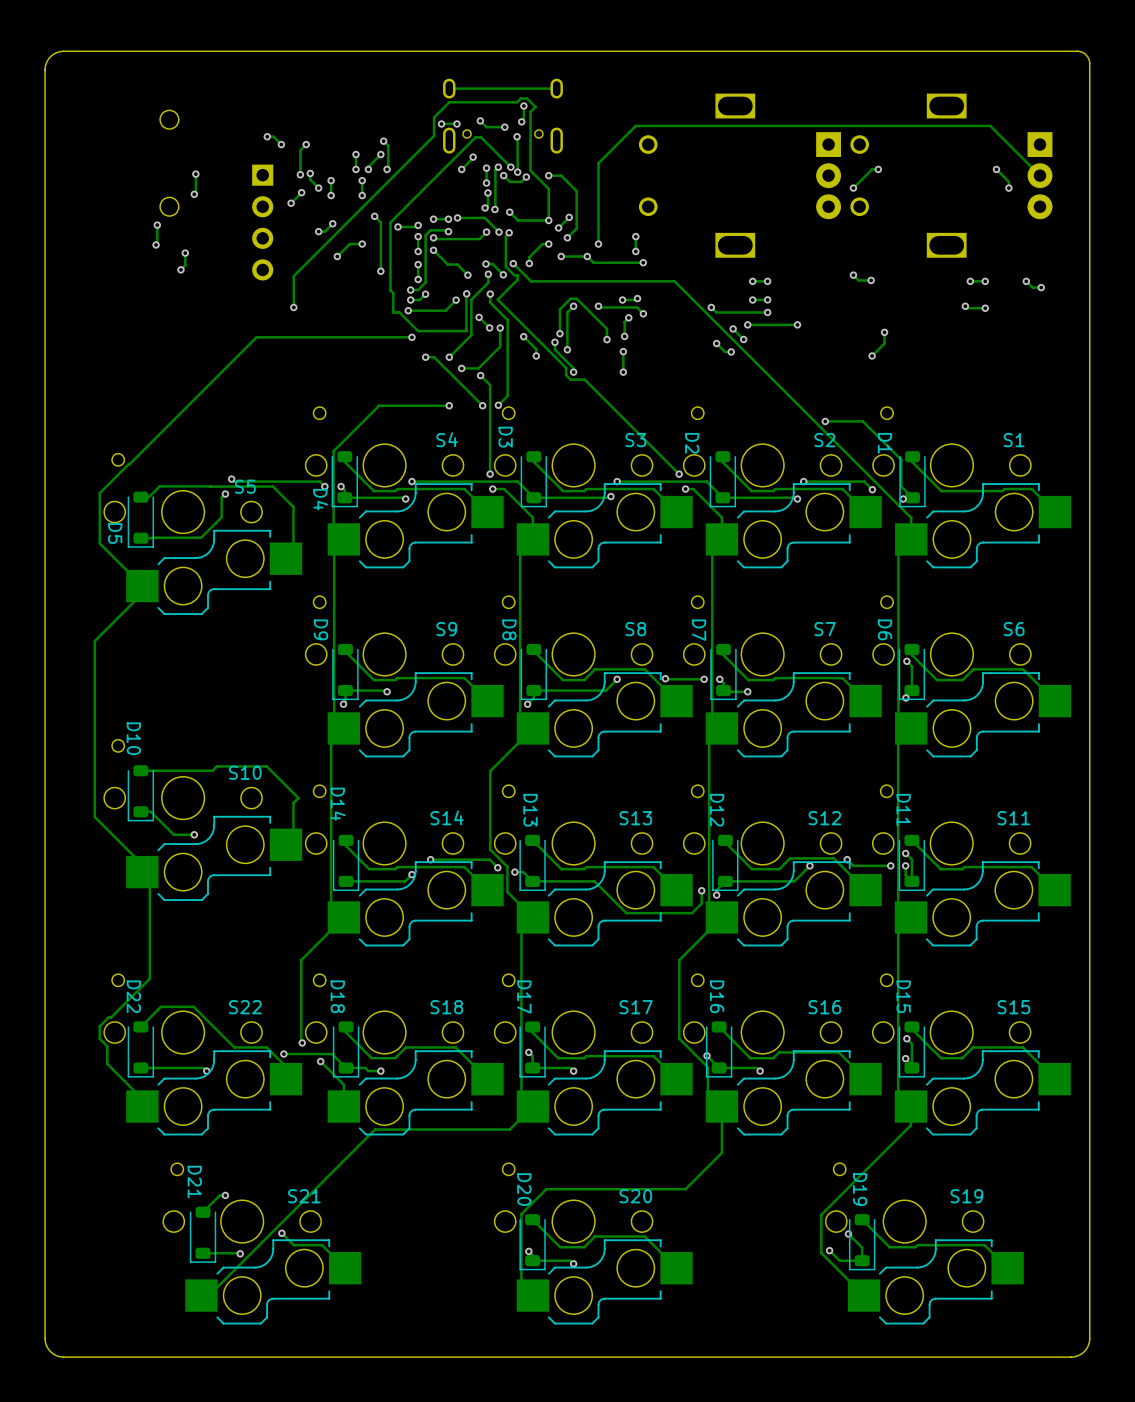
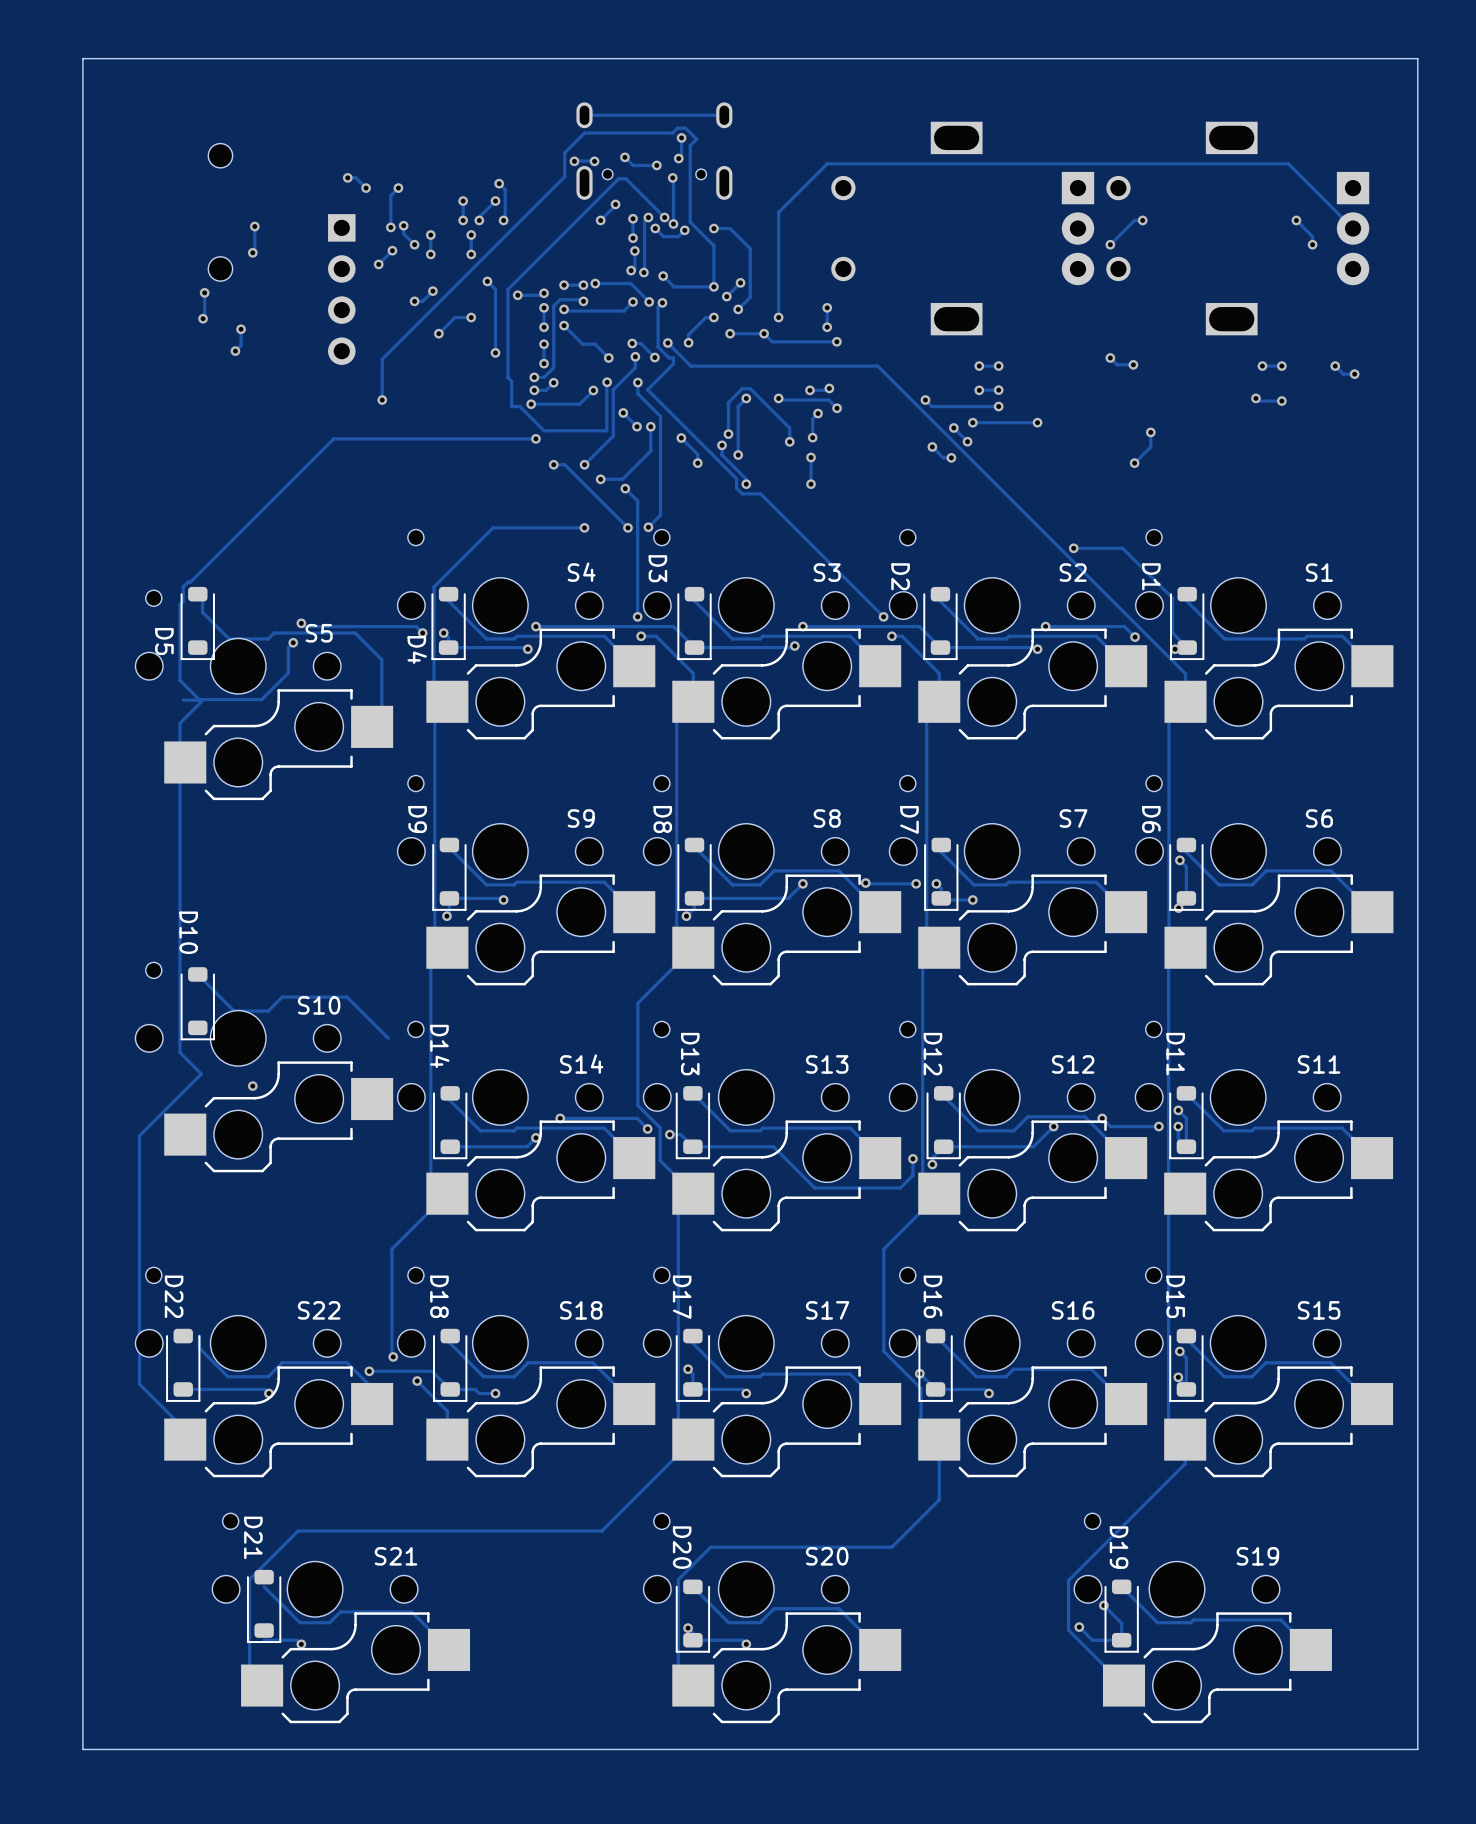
board edge: (1089, 63) (1086, 54) (1077, 51) (63, 51) (50, 56) (45, 69) (45, 1338) (48, 1349) (56, 1355) (63, 1357) (1071, 1357) (1084, 1351) (1089, 1338) -> (1417, 82) (1417, 58) (82, 58) (82, 1749) (1417, 1749) (1417, 1741)
track: (146, 447) (99, 493) (99, 543) (142, 586) -> none
track: (210, 486) (159, 486) (148, 497) (140, 497) -> (274, 633) (268, 638) (229, 638) (202, 612) (202, 594)
D5 position: (140, 519) -> (197, 623)
track: (137, 574) (149, 586) (94, 641) (94, 817) (149, 872) (149, 978) (99, 1026) (99, 1038) (107, 1046) -> (190, 582) (183, 586) (183, 601) (179, 604) (179, 680) (201, 701) (179, 723) (179, 1052) (201, 1073) (139, 1135) (139, 1361)
track: none -> (202, 974) (202, 979) (214, 991)
track: (212, 770) (140, 770) -> (276, 1002) (268, 1011) (234, 1011) (214, 991)
D10 position: (140, 793) -> (197, 1003)
track: (298, 798) (293, 803) (293, 844) -> none
track: (140, 811) (150, 811) (173, 834) (194, 834) -> none
track: (140, 1026) (160, 1006) (193, 1006) (234, 1047) -> (199, 1336) (199, 1348) (227, 1376) (268, 1376) (282, 1362) (304, 1362)
track: (509, 1129) (375, 1129) (209, 1295) (201, 1295) -> (663, 1469) (601, 1531) (298, 1531) (249, 1579) (249, 1672) (262, 1685)
track: (225, 1195) (219, 1195) (203, 1212) -> none
via: (225, 1195) -> none
track: none -> (264, 1586) (299, 1622) (329, 1622) (340, 1611) (411, 1611) (449, 1649)
track: (281, 1233) (293, 1245) (322, 1245) (345, 1268) -> none
via: (281, 1233) -> none
track: (203, 1253) (240, 1253) -> none
via position: (240, 1253) -> (301, 1644)
track: none -> (264, 1640) (297, 1640) (301, 1644)

